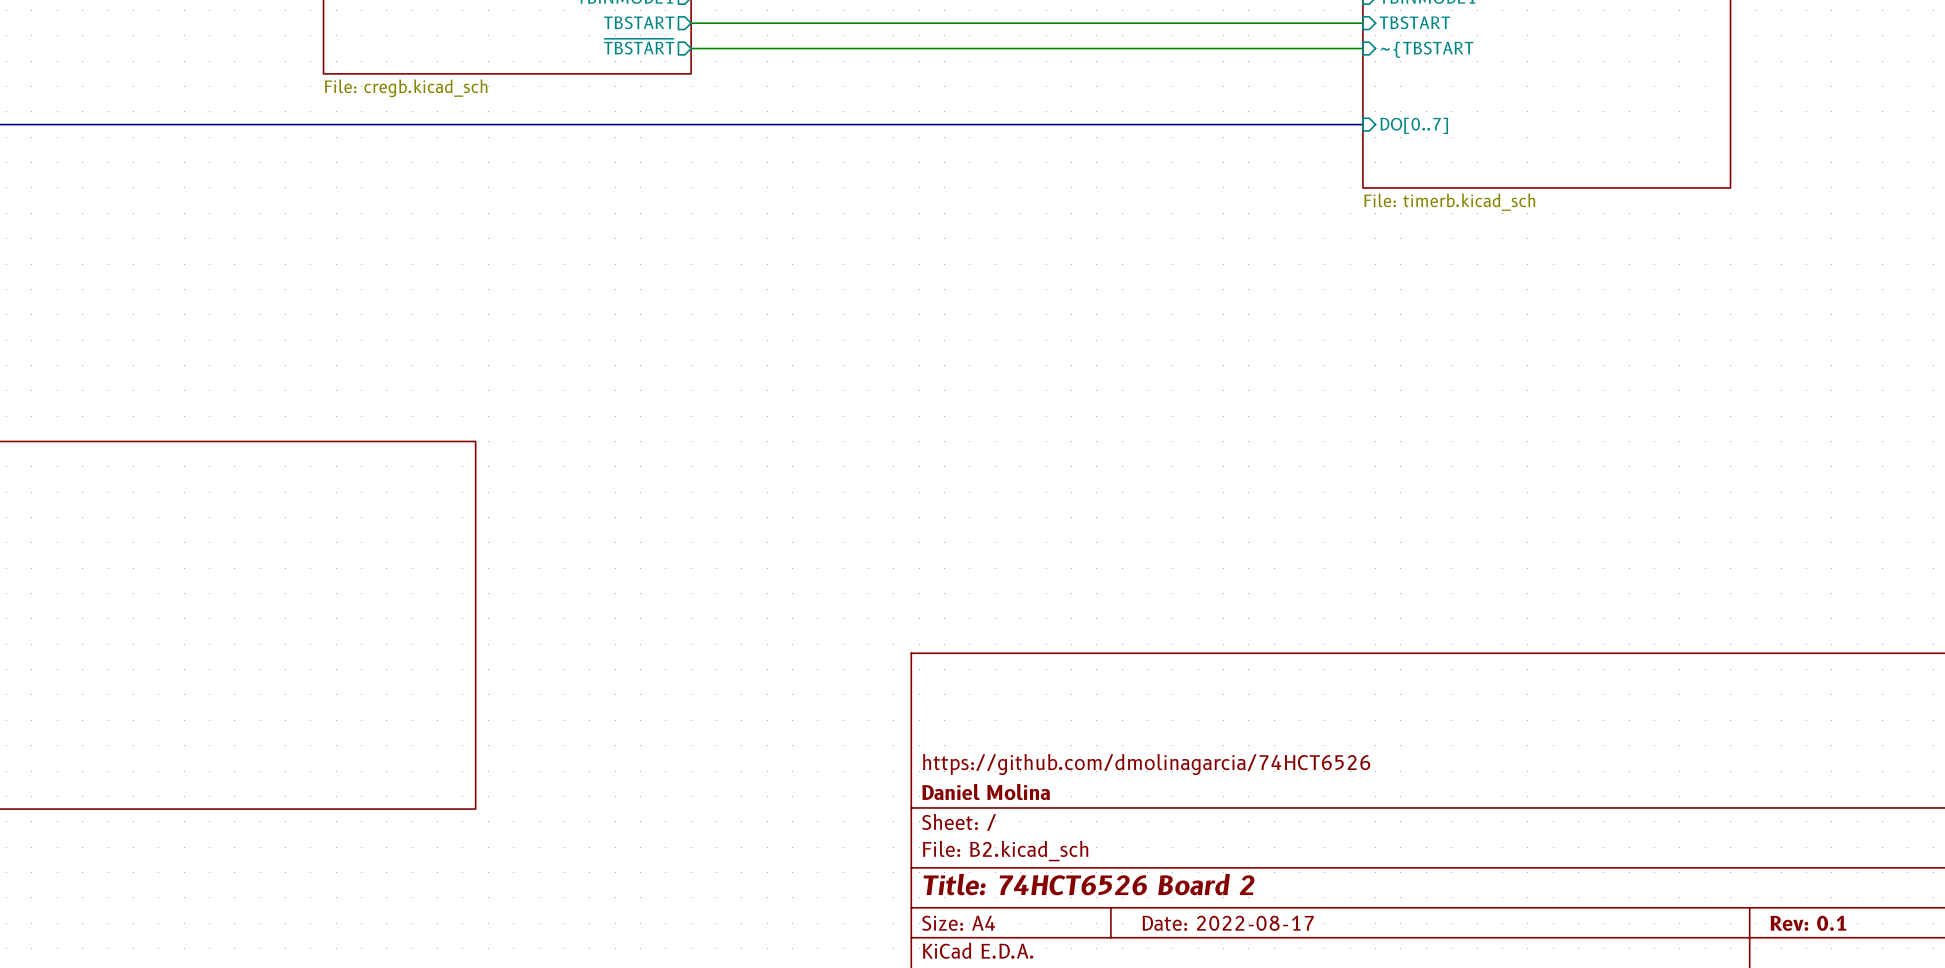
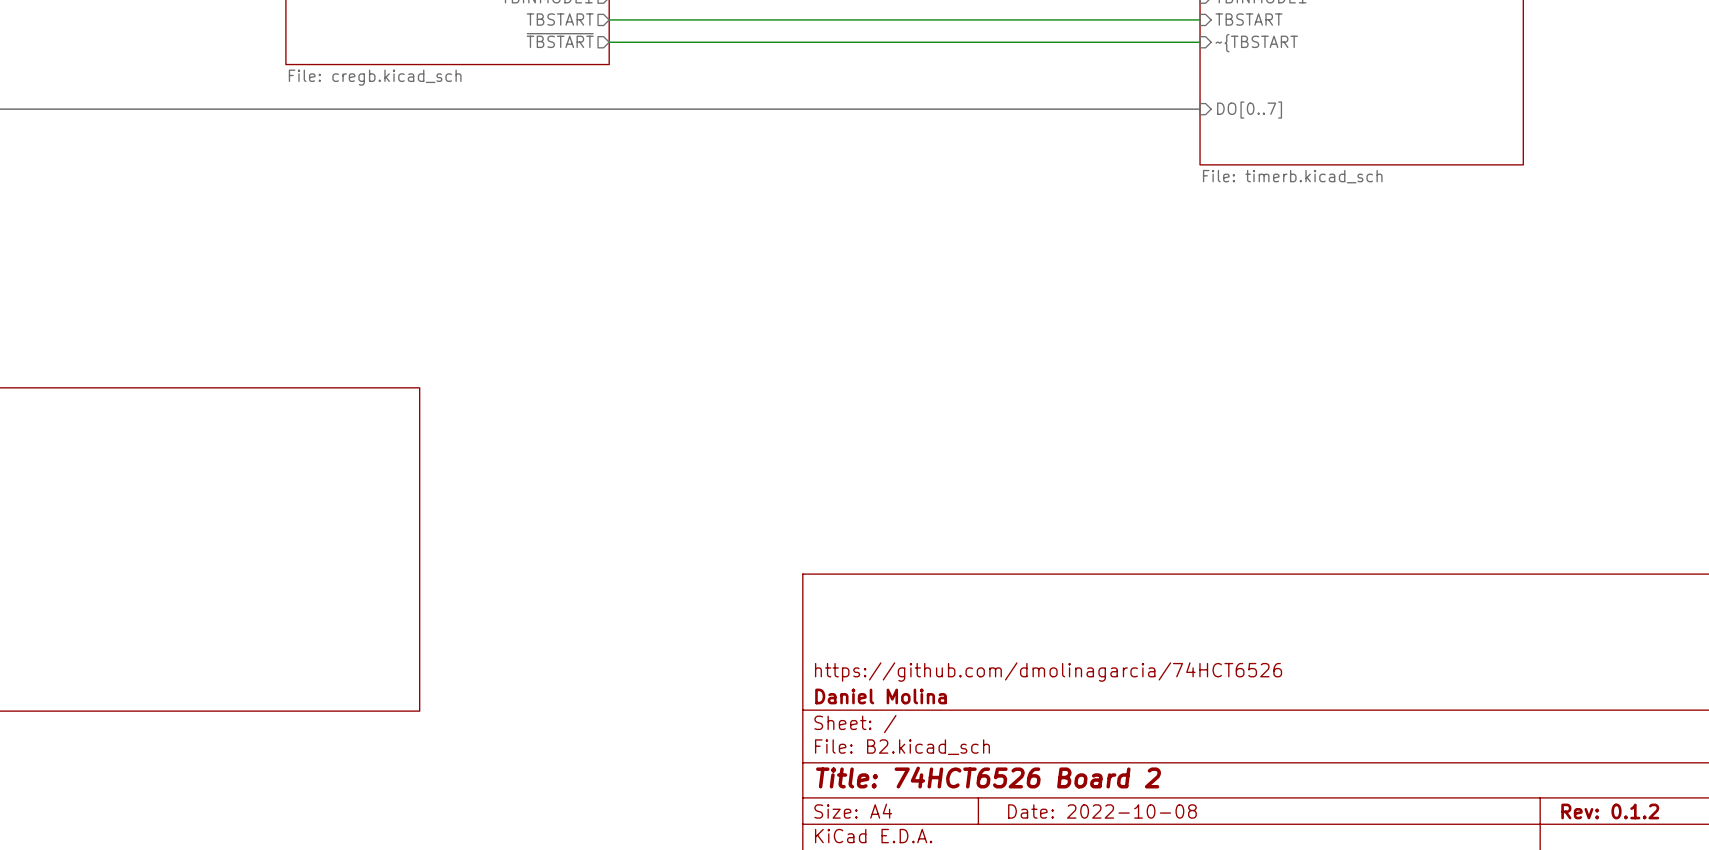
title block: Date: 2022-08-17 (1228, 923) -> Date: 2022-10-08 (1102, 811)
title block: Rev: 0.1 (1808, 923) -> Rev: 0.1.2 (1610, 811)

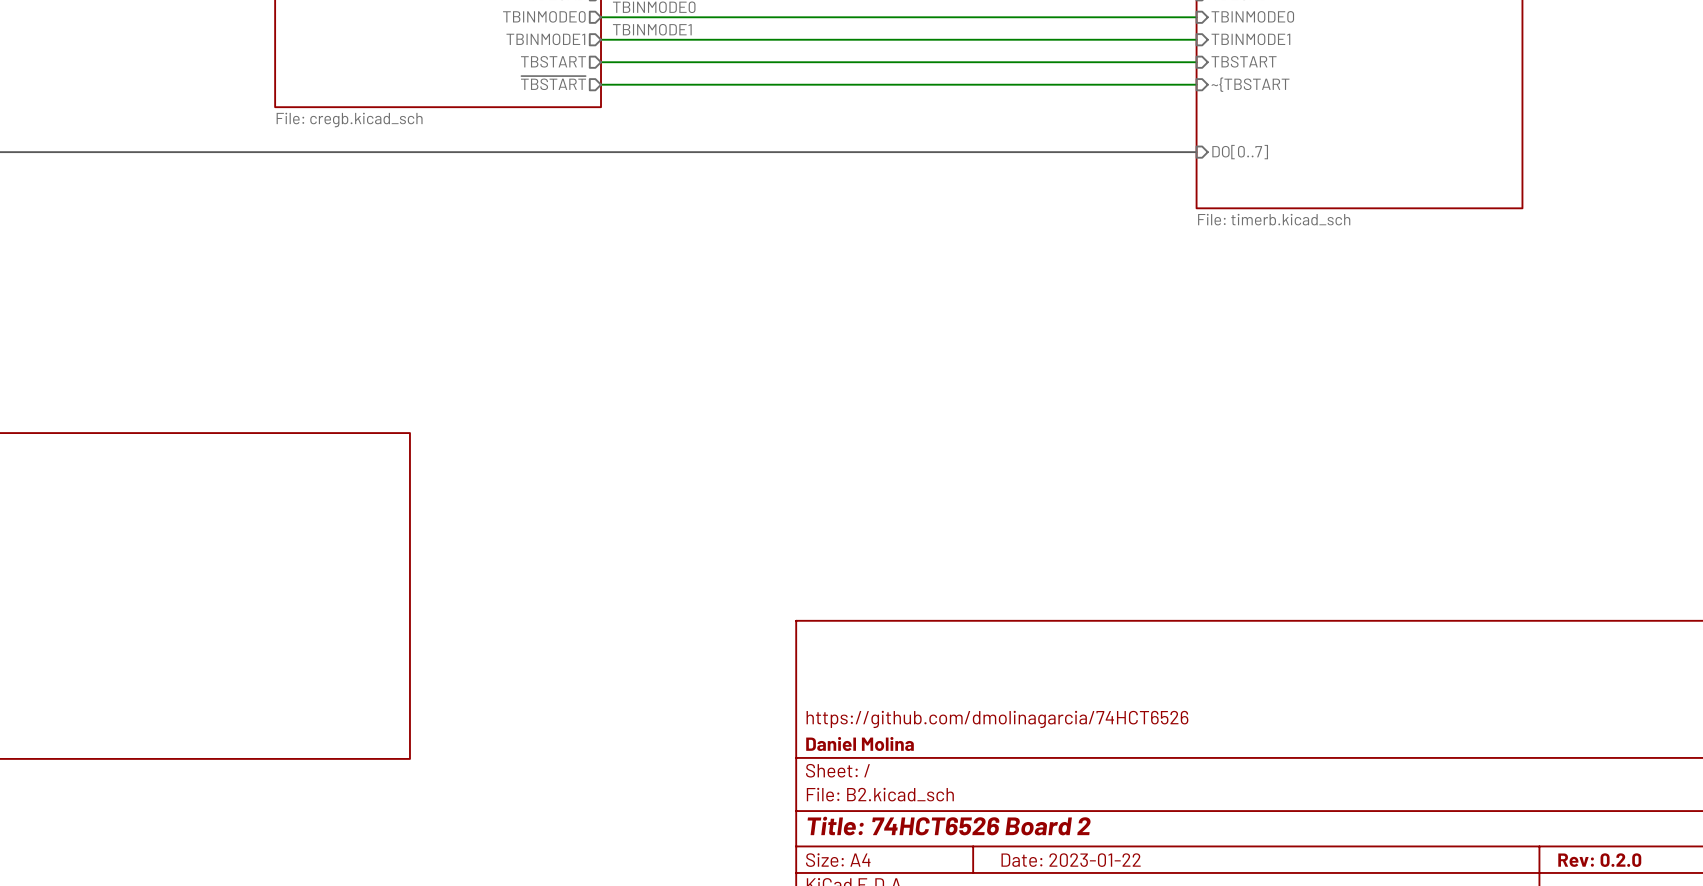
title block: Date: 2022-10-08 (1102, 811) -> Date: 2023-01-22 (1071, 860)
title block: Rev: 0.1.2 (1610, 811) -> Rev: 0.2.0 (1599, 860)

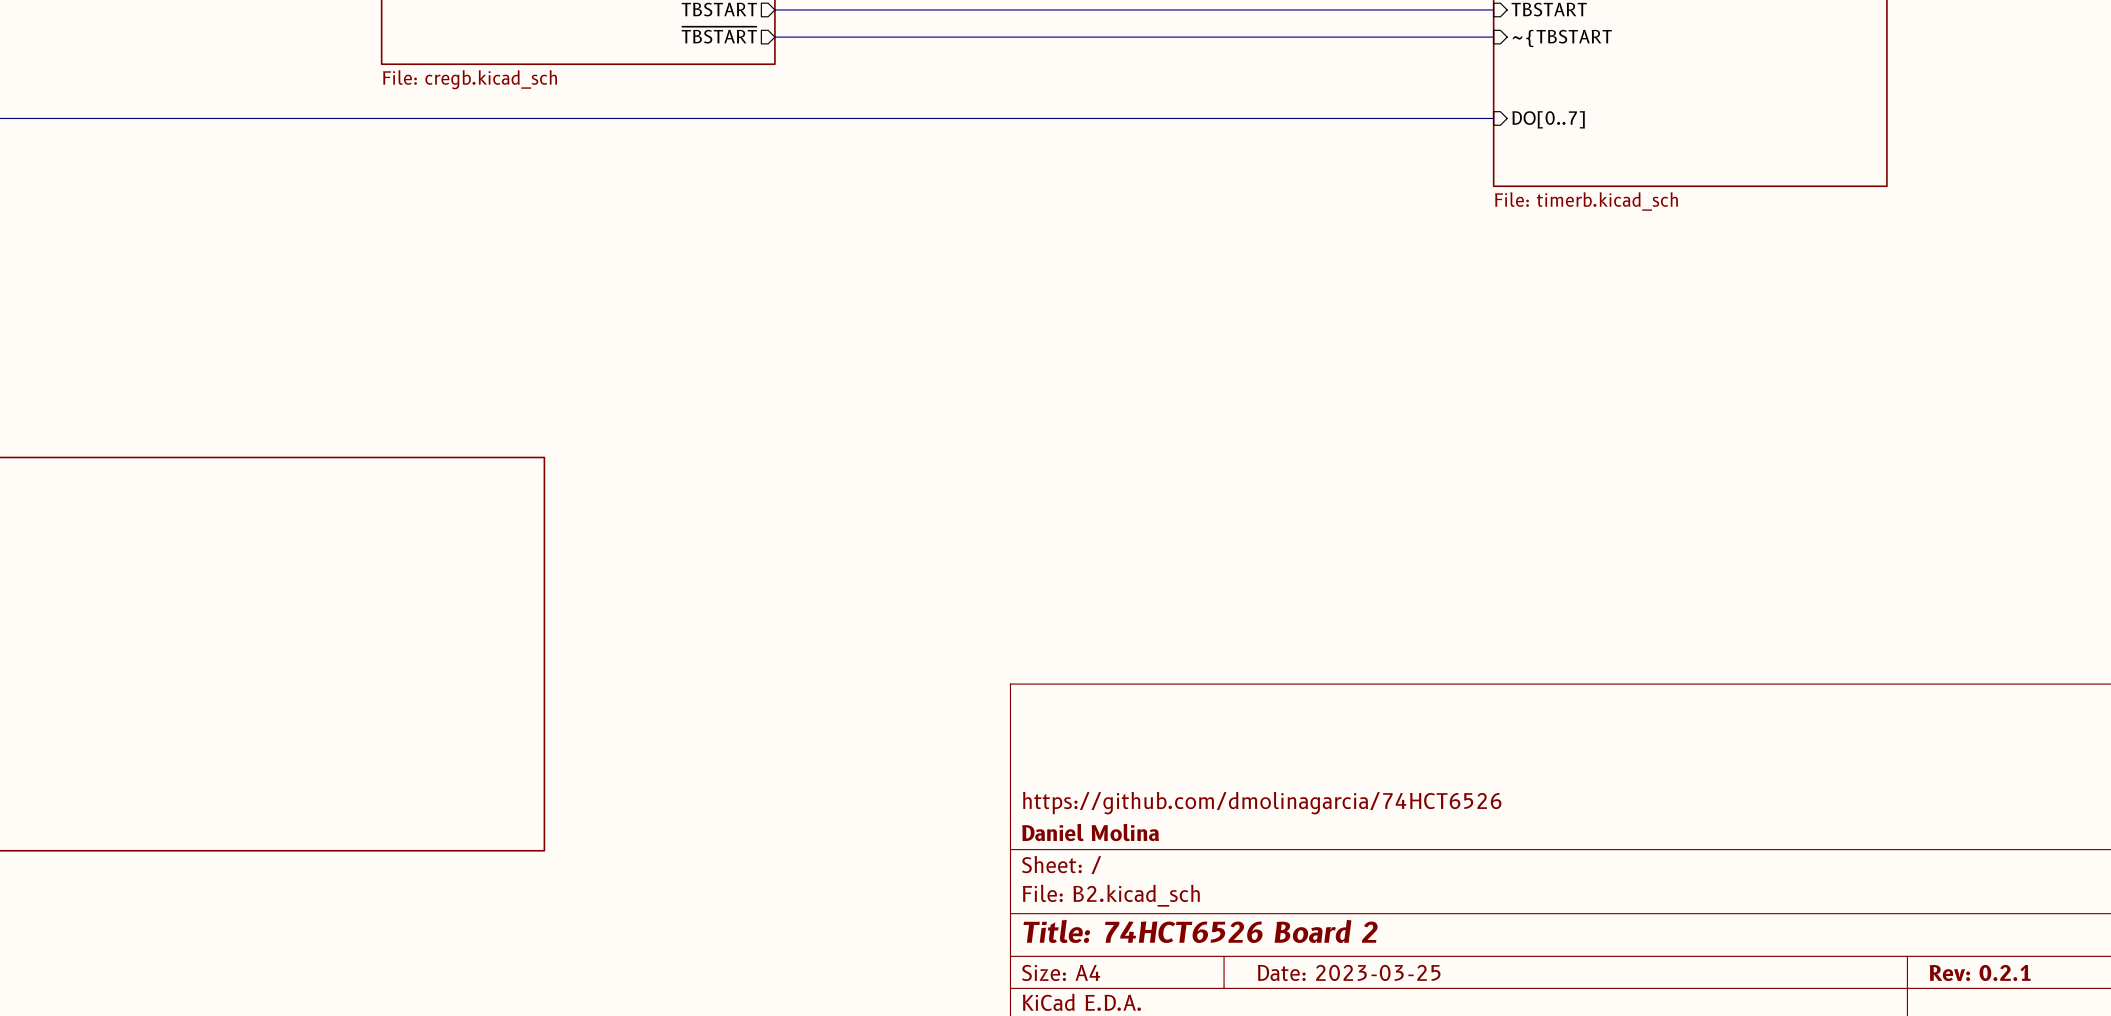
title block: Date: 2023-01-22 (1071, 860) -> Date: 2023-03-25 (1349, 972)
title block: Rev: 0.2.0 (1599, 860) -> Rev: 0.2.1 (1980, 972)

